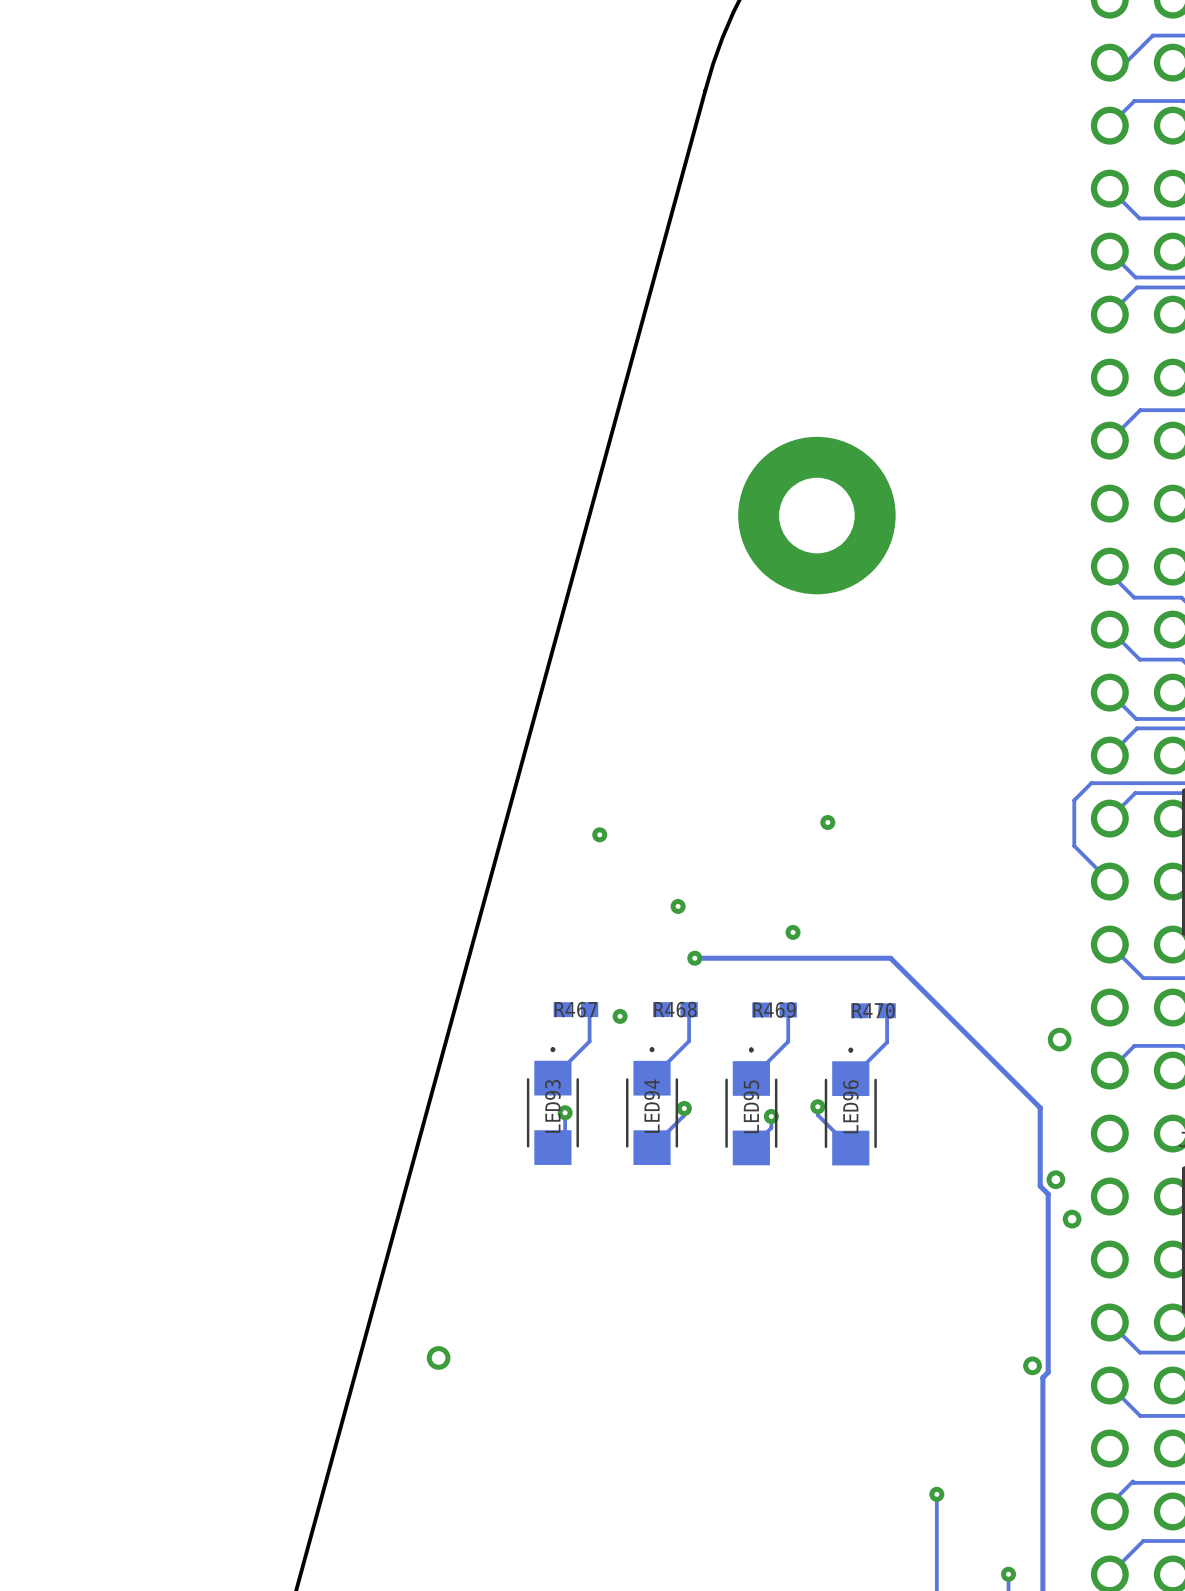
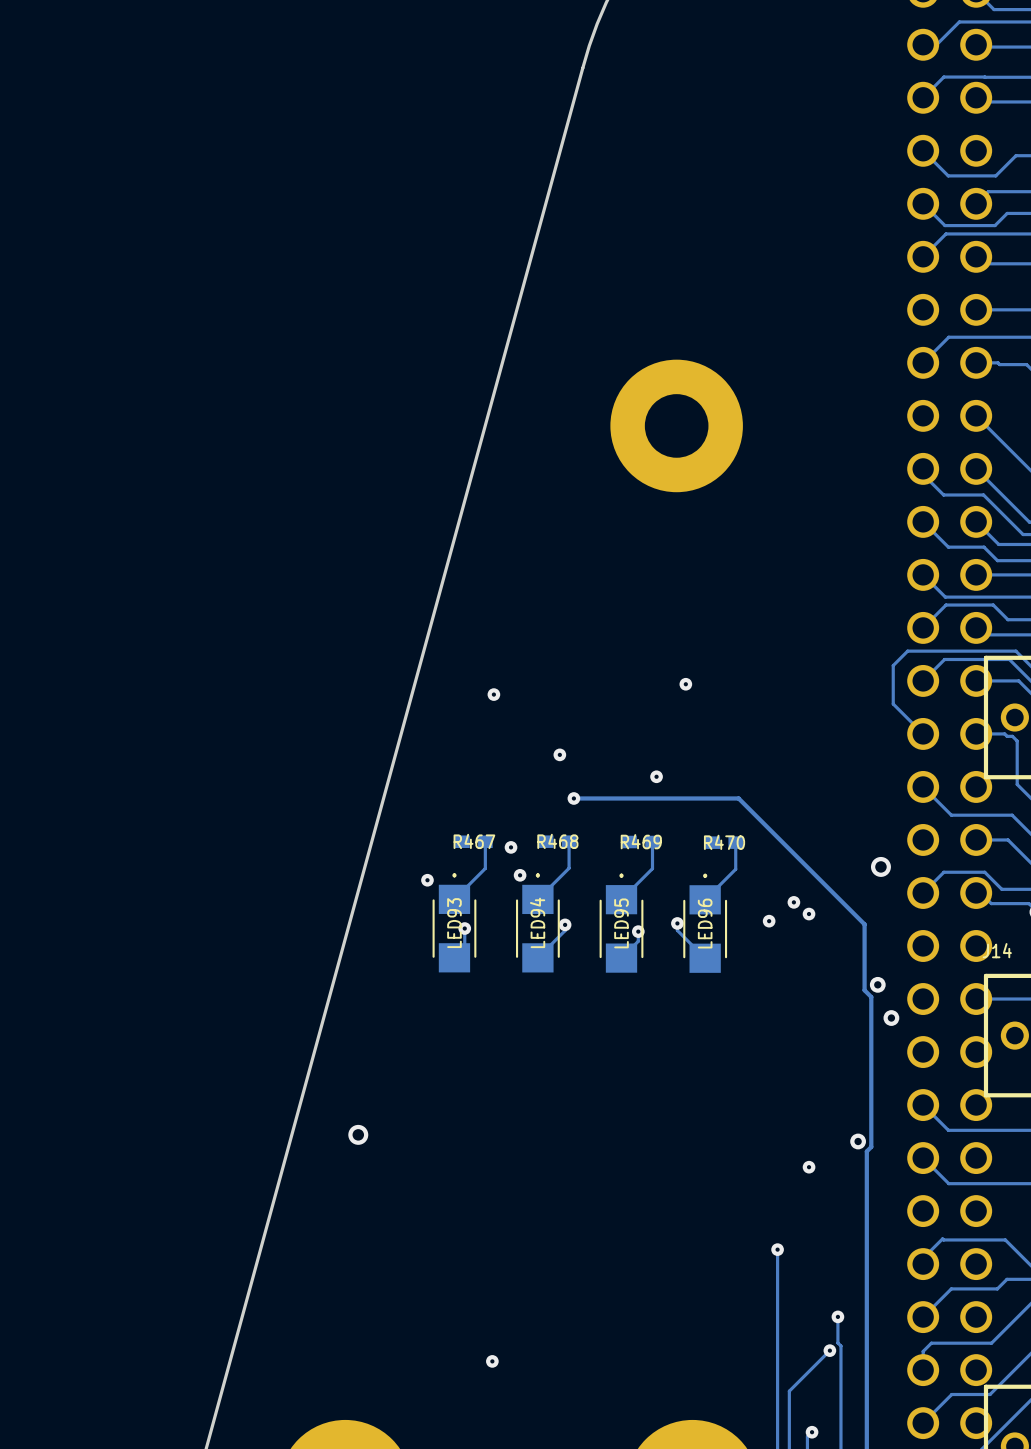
via: none -> (520, 875)
via: none -> (427, 880)
via: none -> (793, 902)
via: none -> (809, 914)
via: none -> (769, 921)
via: none -> (809, 1167)

